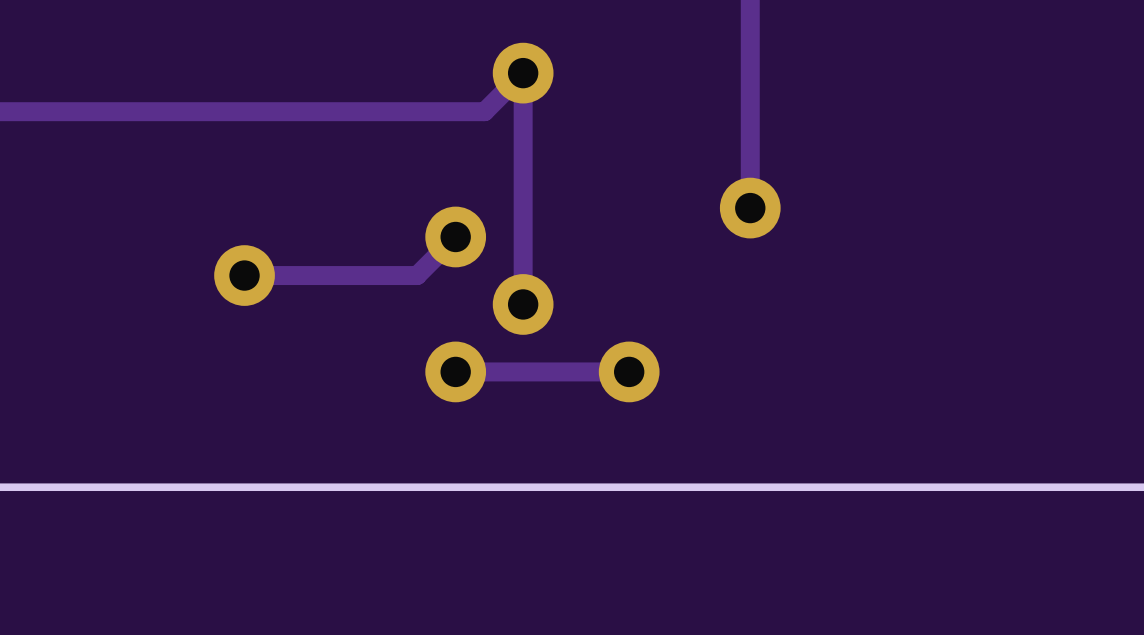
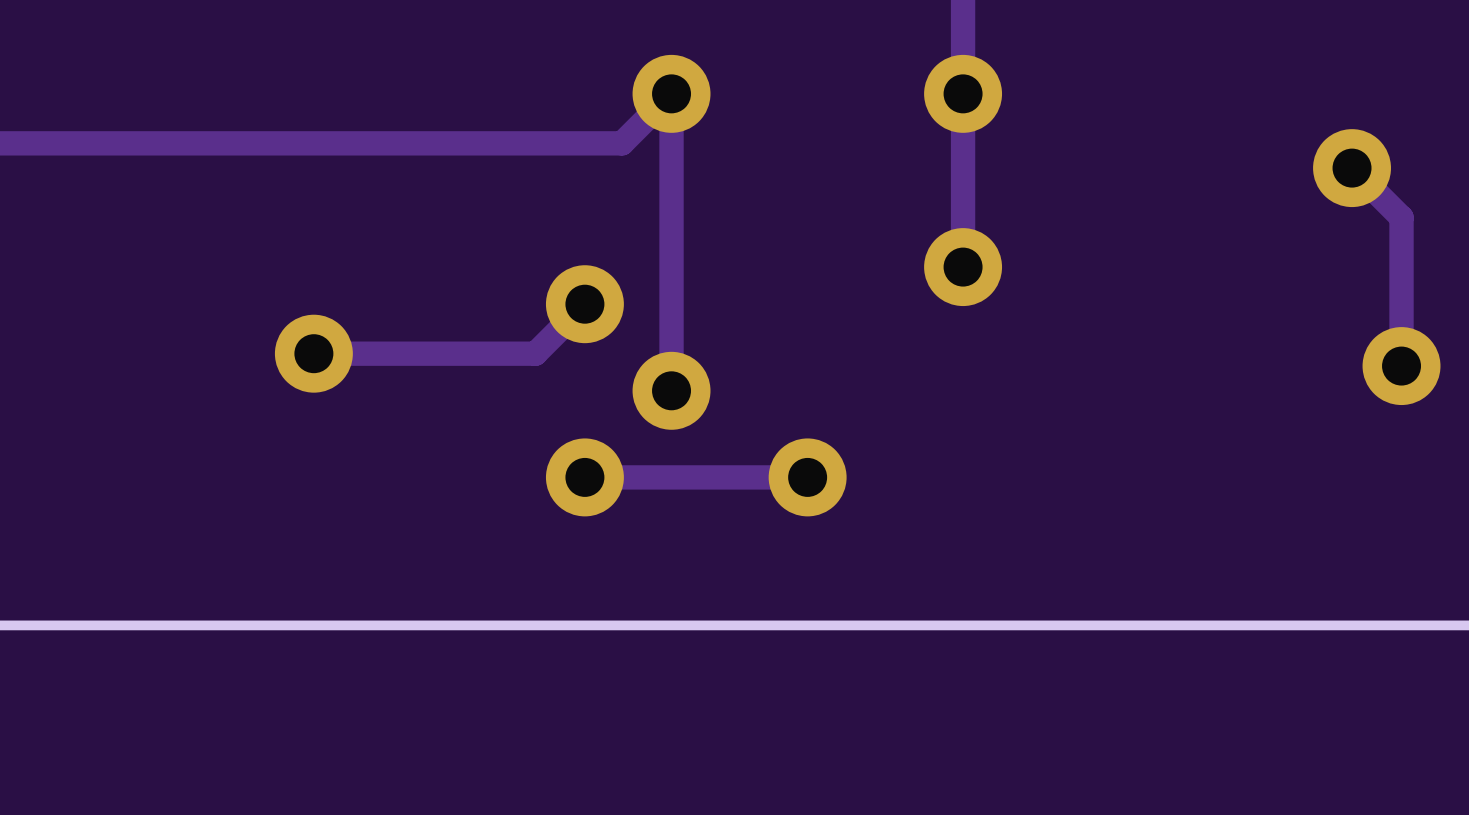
via: none -> (963, 93)
track: none -> (1352, 168) (1401, 217) (1401, 366)
via: none -> (1352, 168)
via: none -> (1401, 366)

